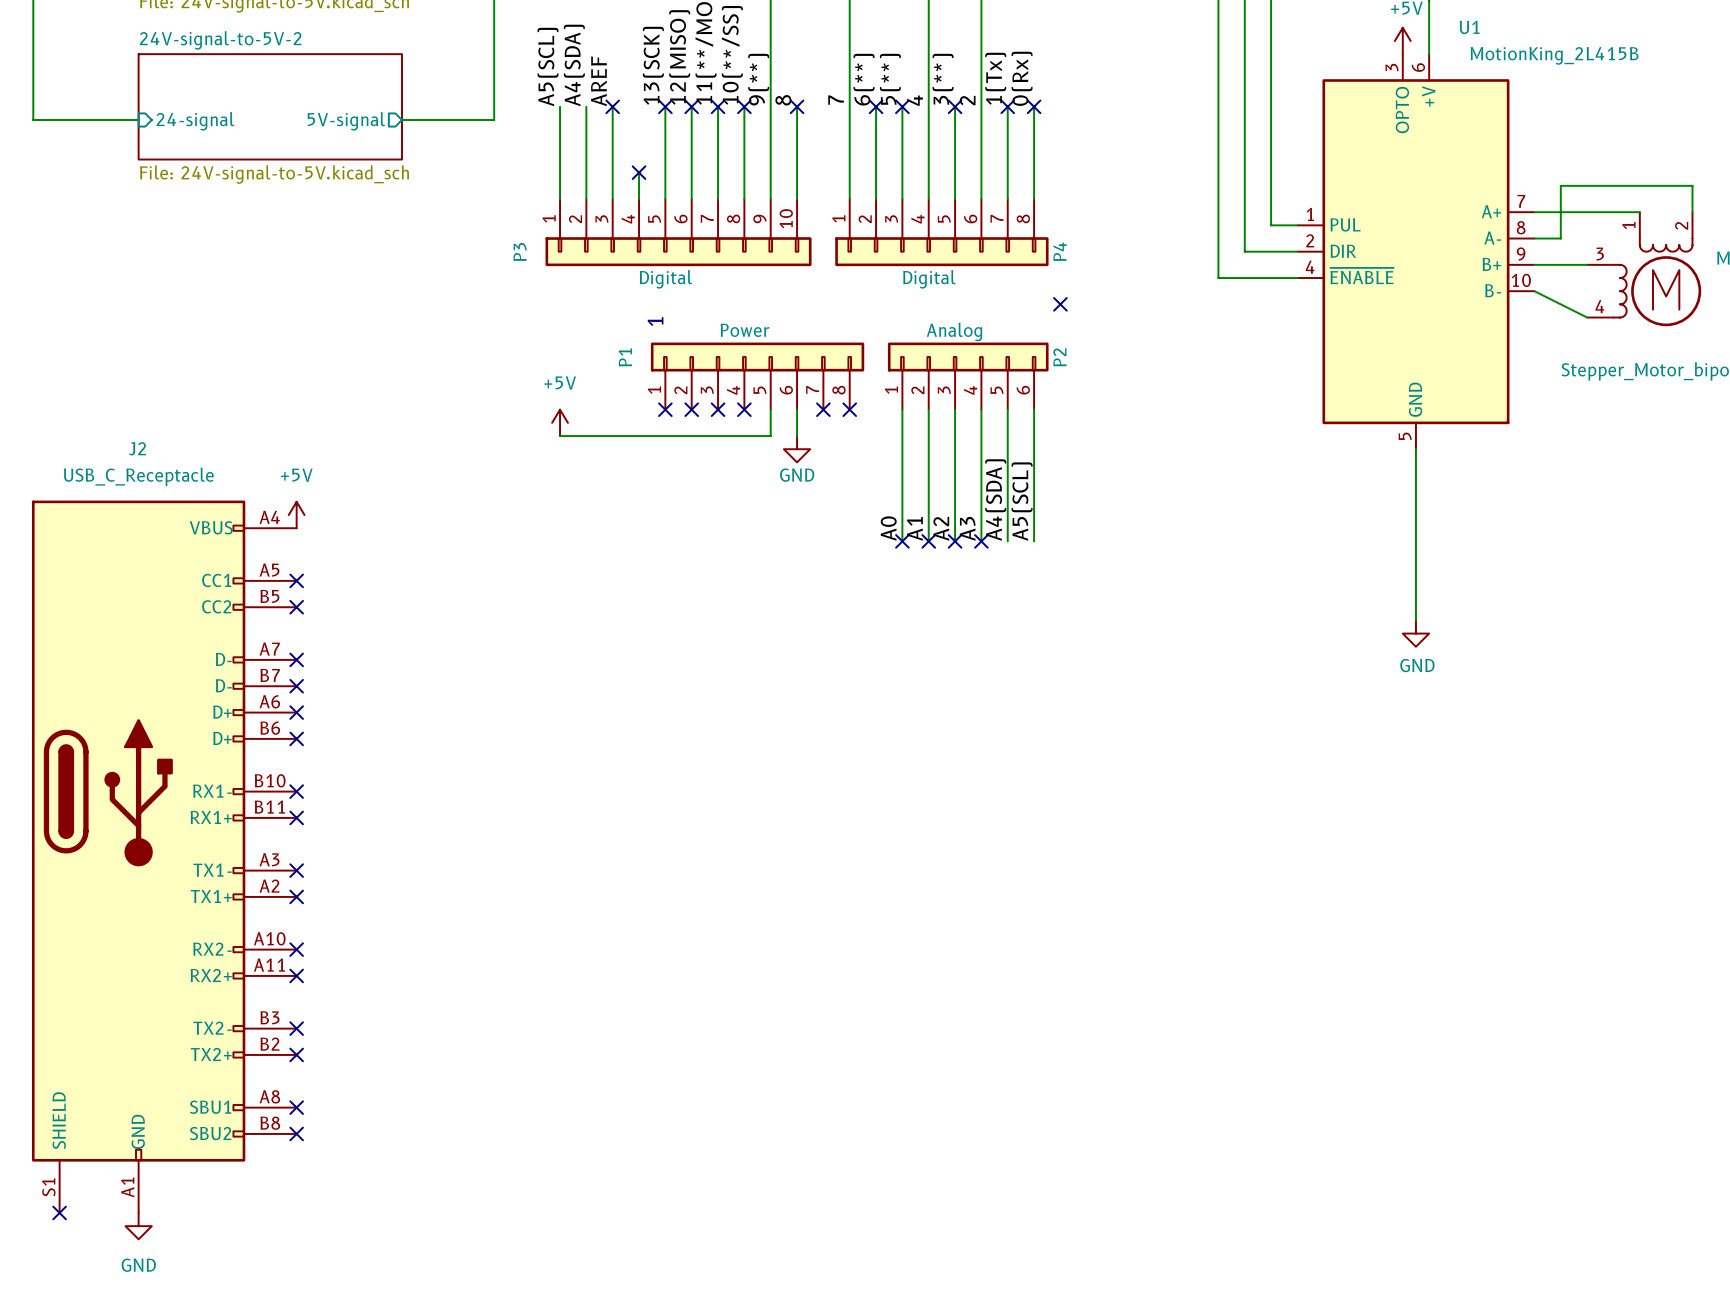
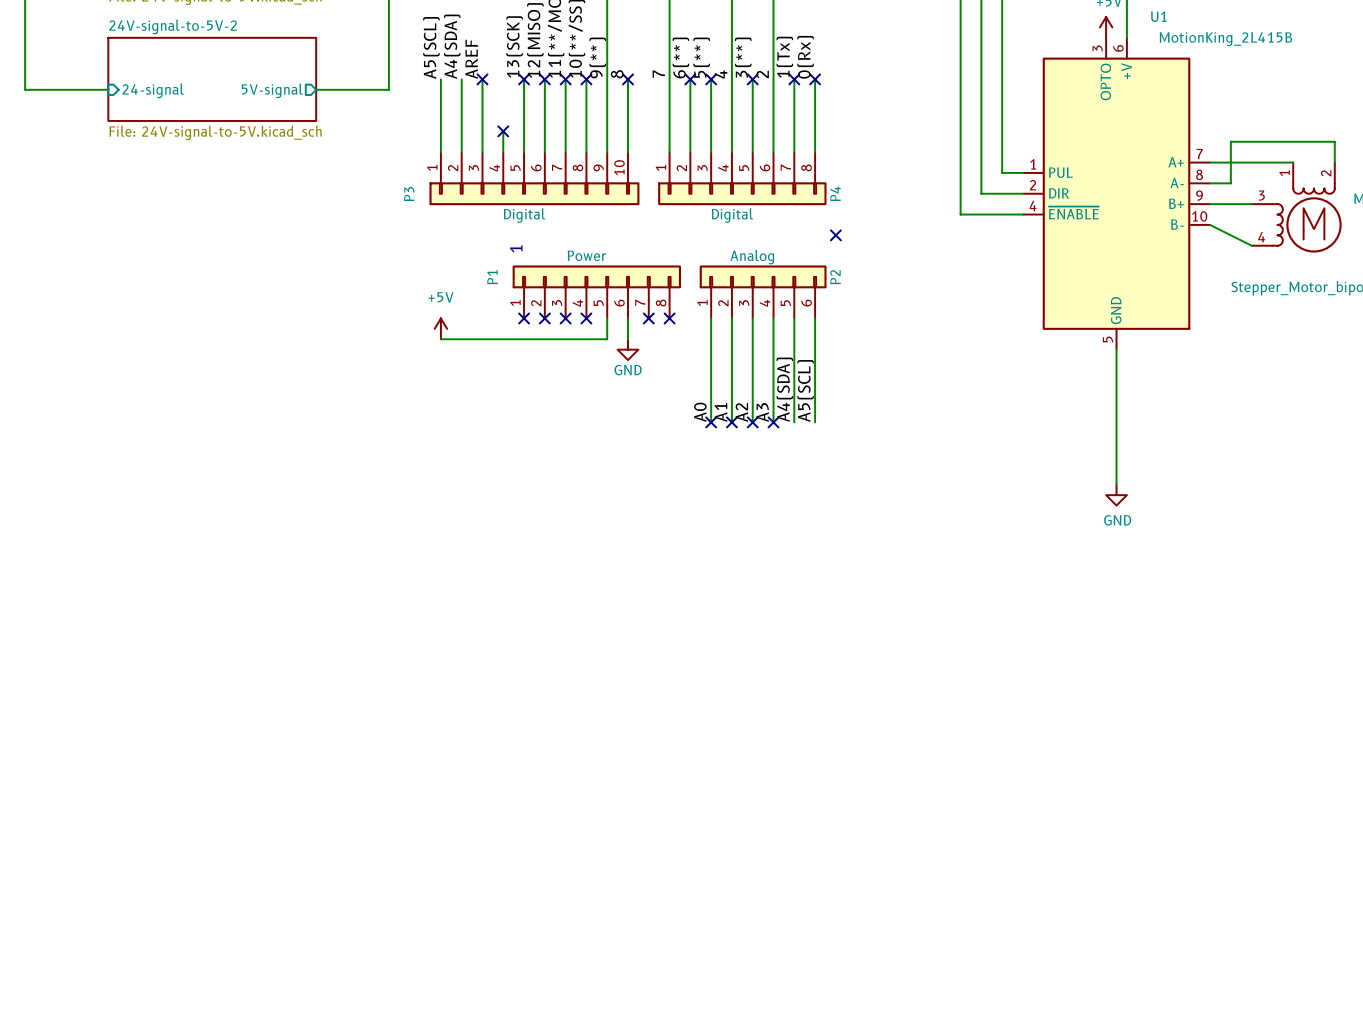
power symbol: +5V (296, 515) -> none
no-connect mark: (296, 580) -> none
no-connect mark: (296, 607) -> none
no-connect mark: (296, 659) -> none
no-connect mark: (296, 686) -> none
no-connect mark: (296, 712) -> none
no-connect mark: (296, 738) -> none
no-connect mark: (296, 791) -> none
no-connect mark: (296, 817) -> none
J2: USB_C_Receptacle (164, 856) -> none
no-connect mark: (296, 870) -> none
no-connect mark: (296, 896) -> none
no-connect mark: (296, 949) -> none
no-connect mark: (296, 975) -> none
no-connect mark: (296, 1028) -> none
no-connect mark: (296, 1054) -> none
no-connect mark: (296, 1107) -> none
no-connect mark: (296, 1133) -> none
no-connect mark: (59, 1212) -> none
power symbol: GND (138, 1226) -> none

